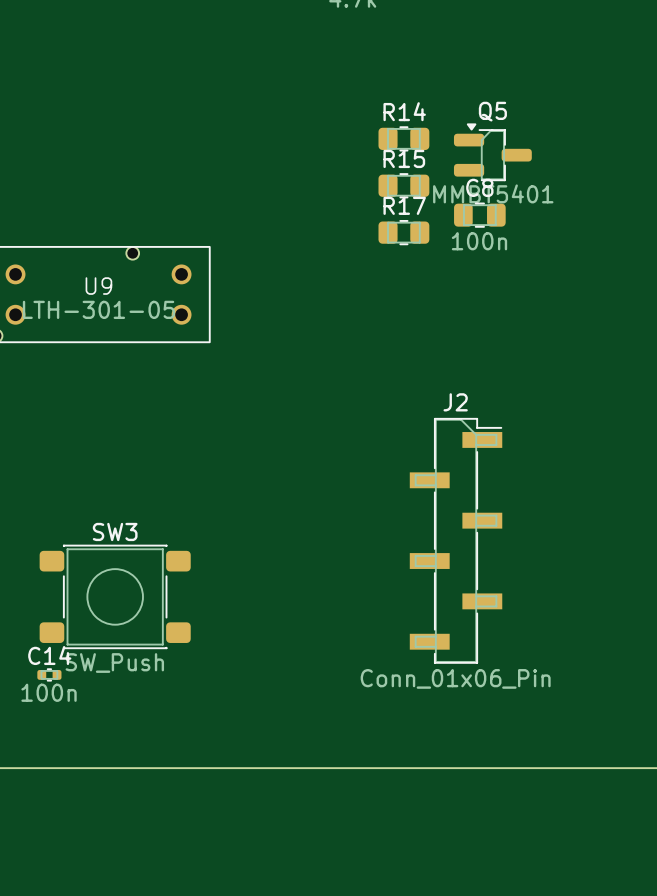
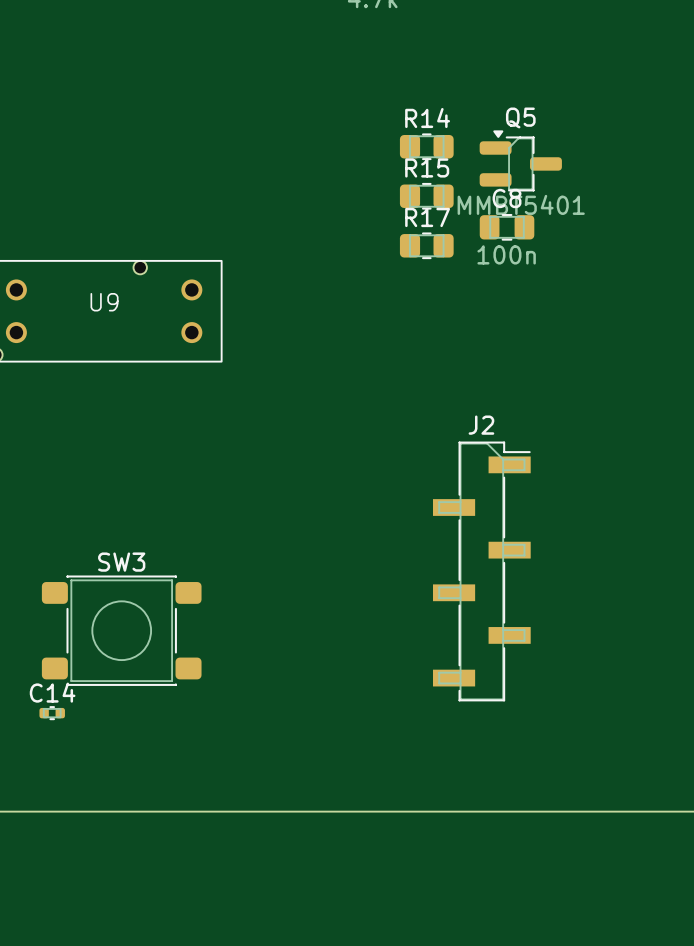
U9 value: LTH-301-05 (98, 309) -> none
SW3 value: SW_Push (114, 663) -> none
J2 value: Conn_01x06_Pin (455, 678) -> none
C14 value: 100n (49, 692) -> none

